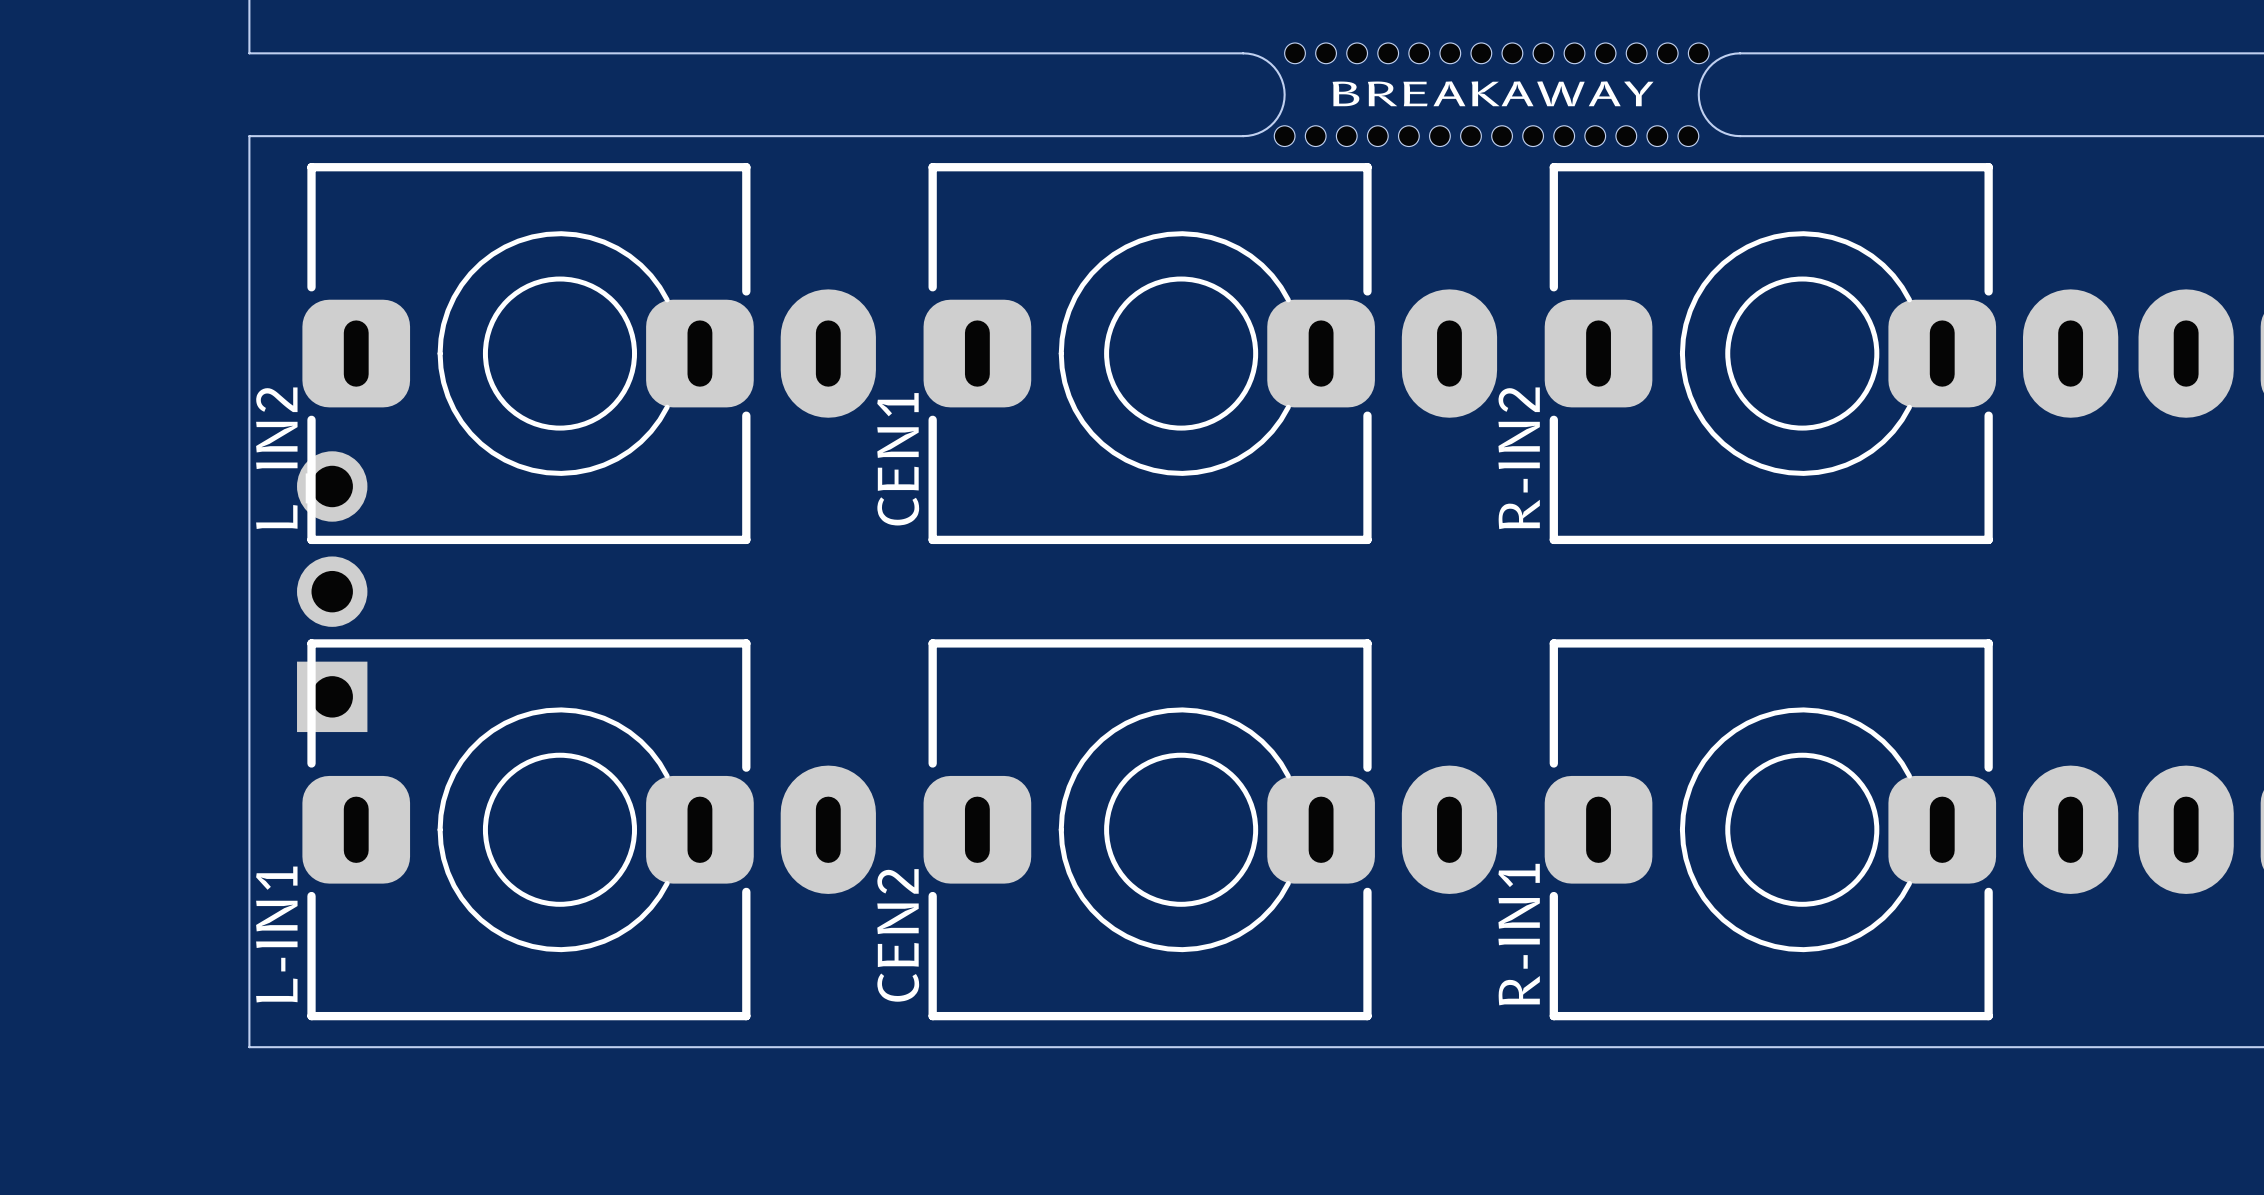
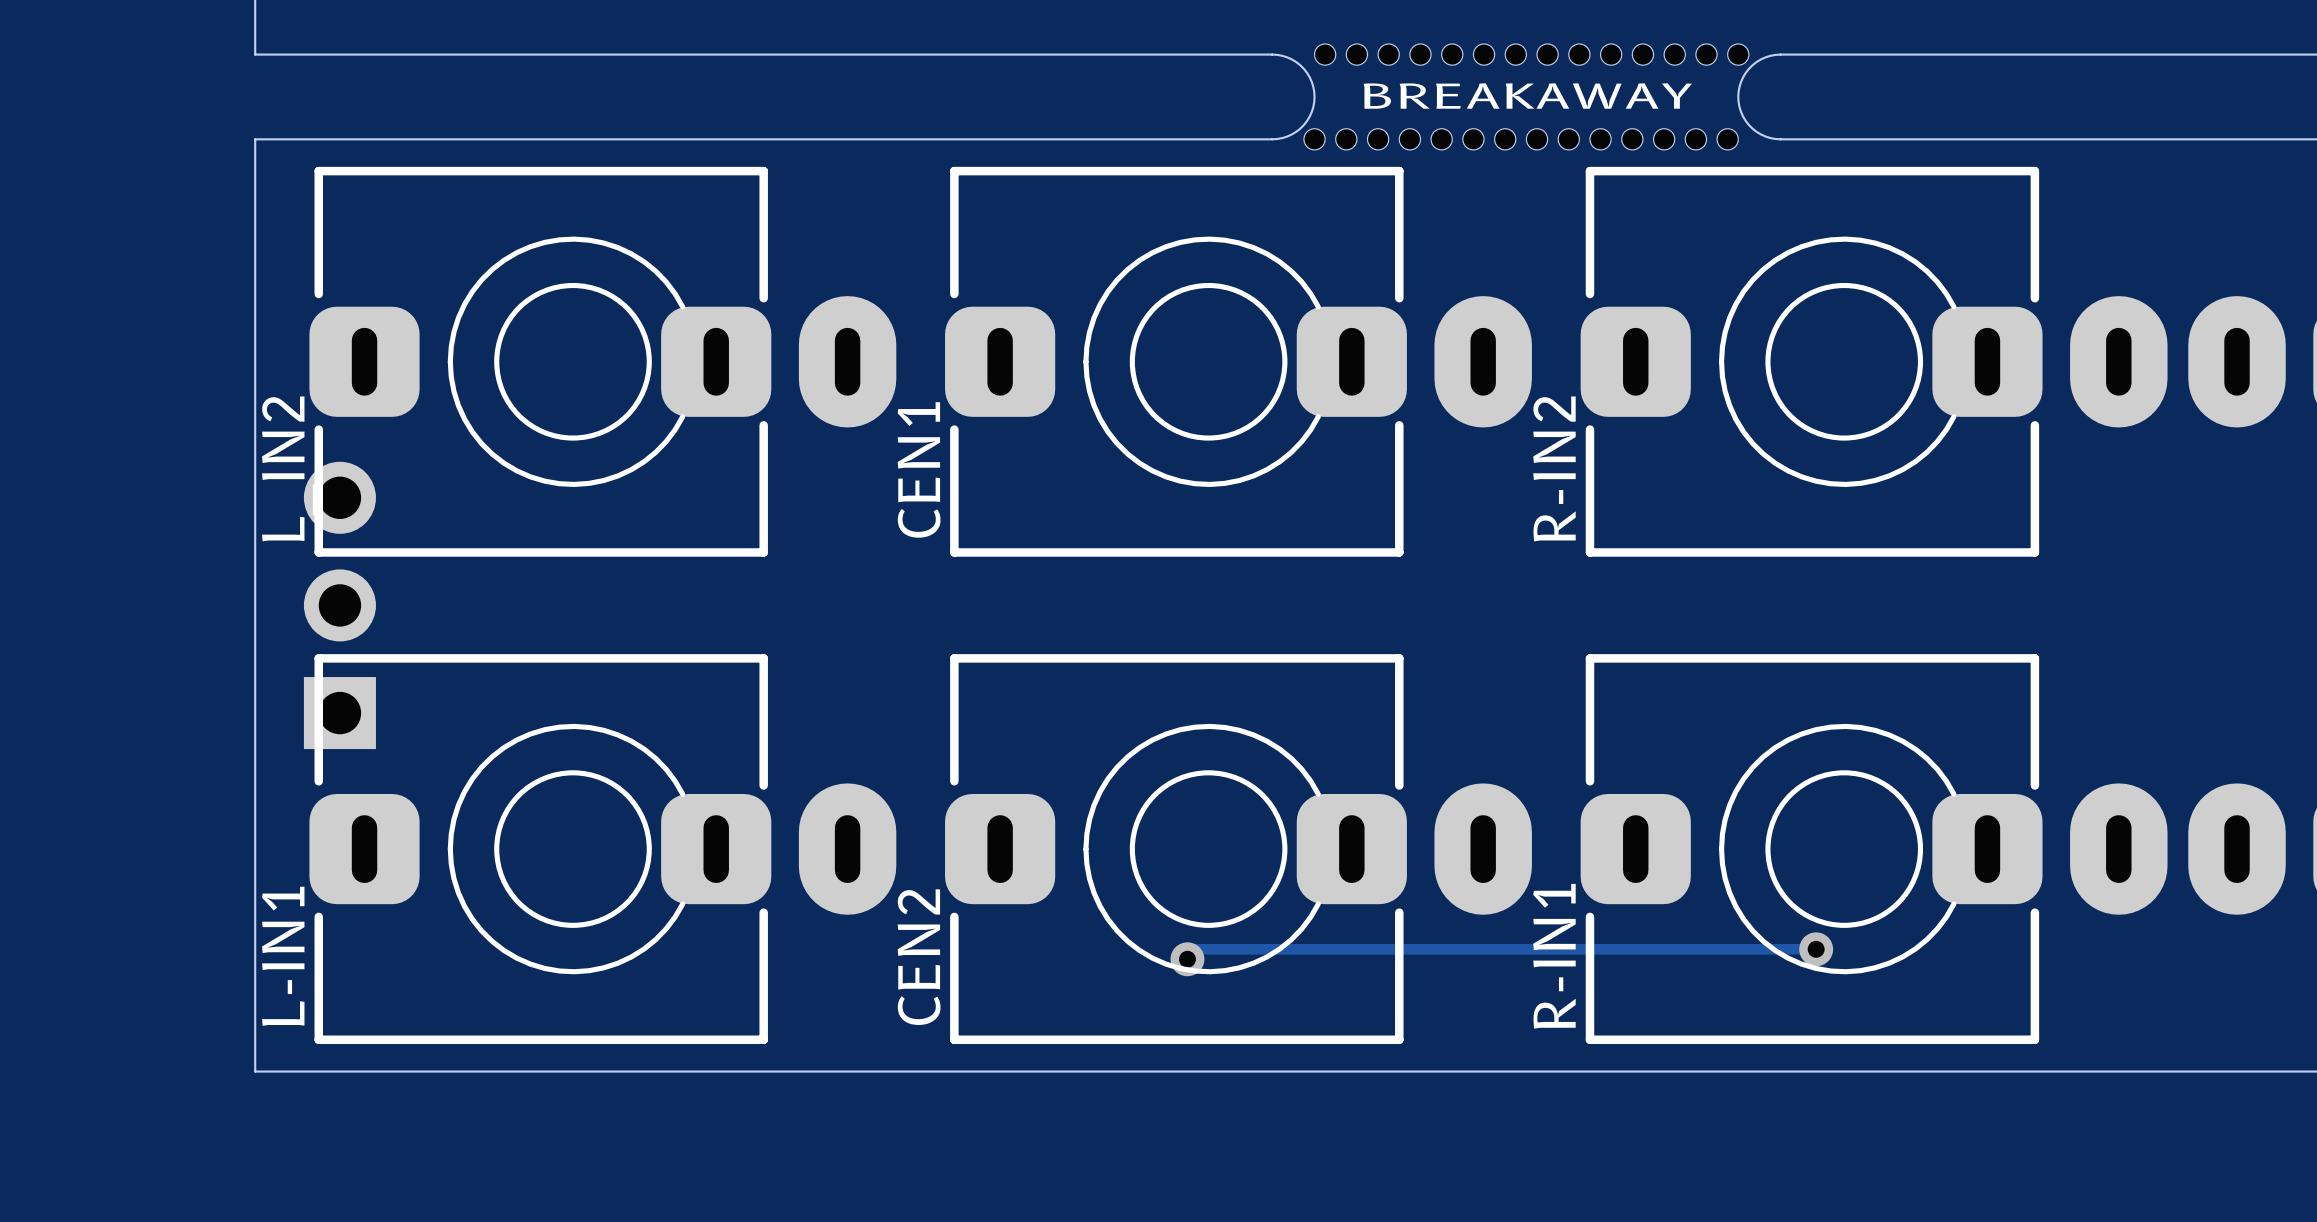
track: none -> (1816, 949) (1197, 949) (1187, 959)
via: none -> (1816, 949)
via: none -> (1187, 959)

